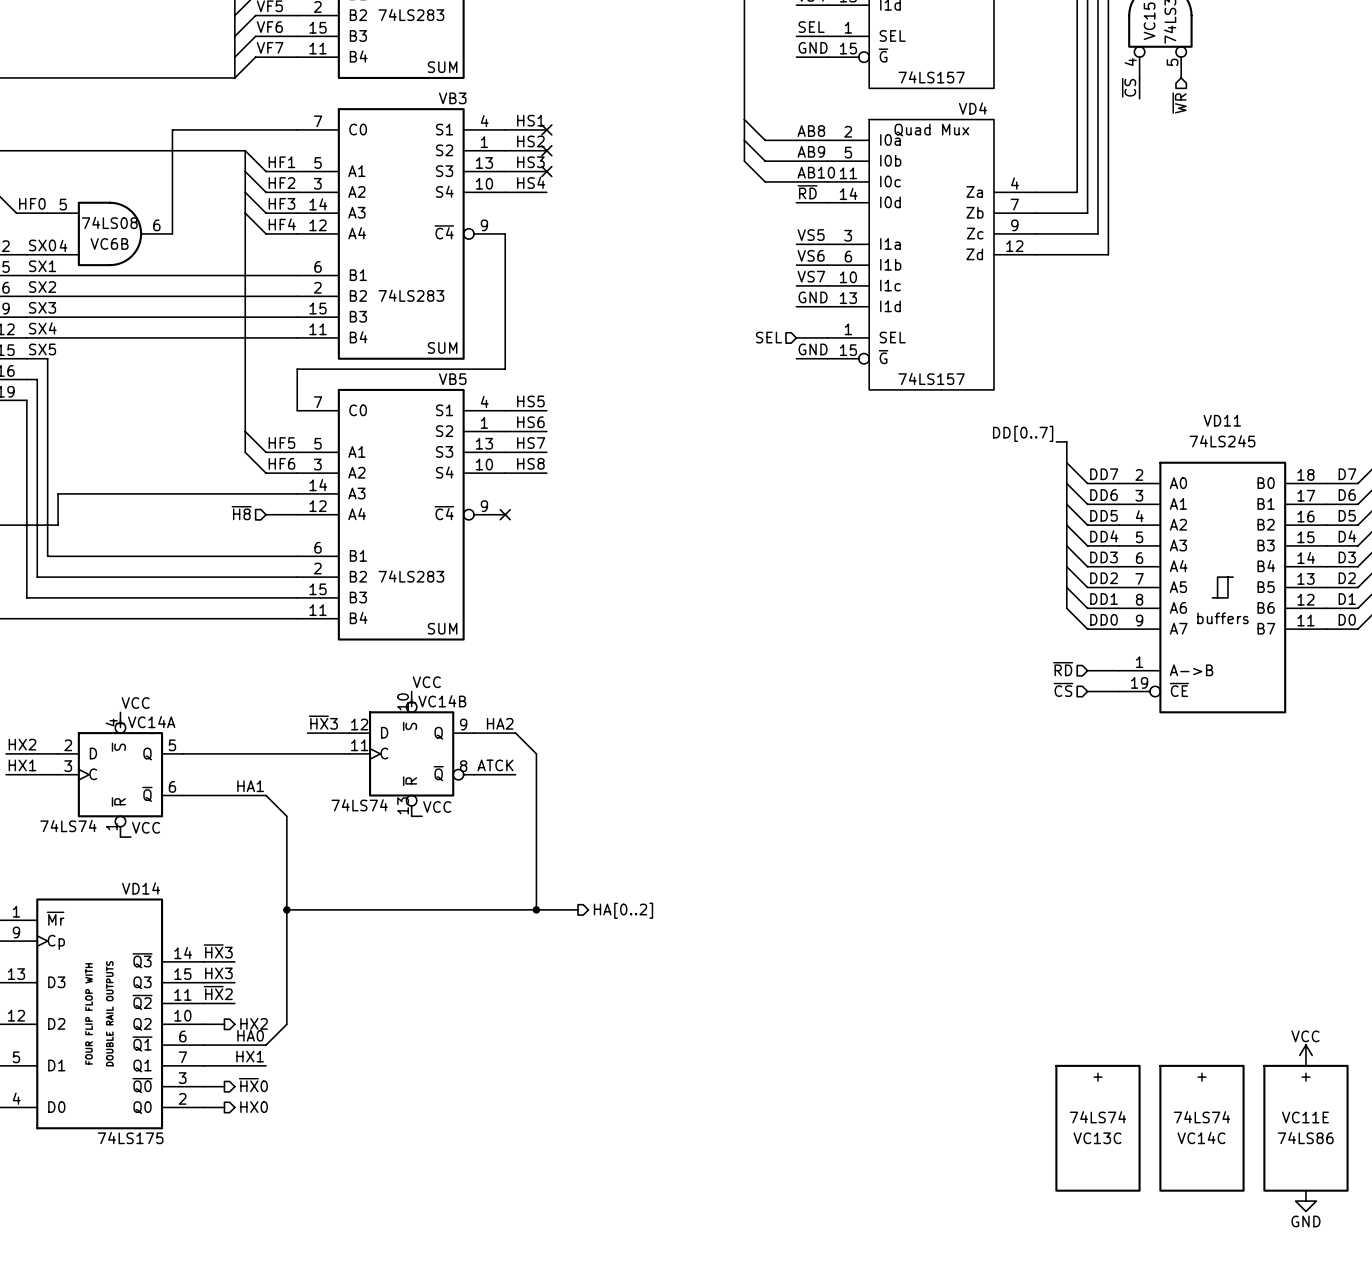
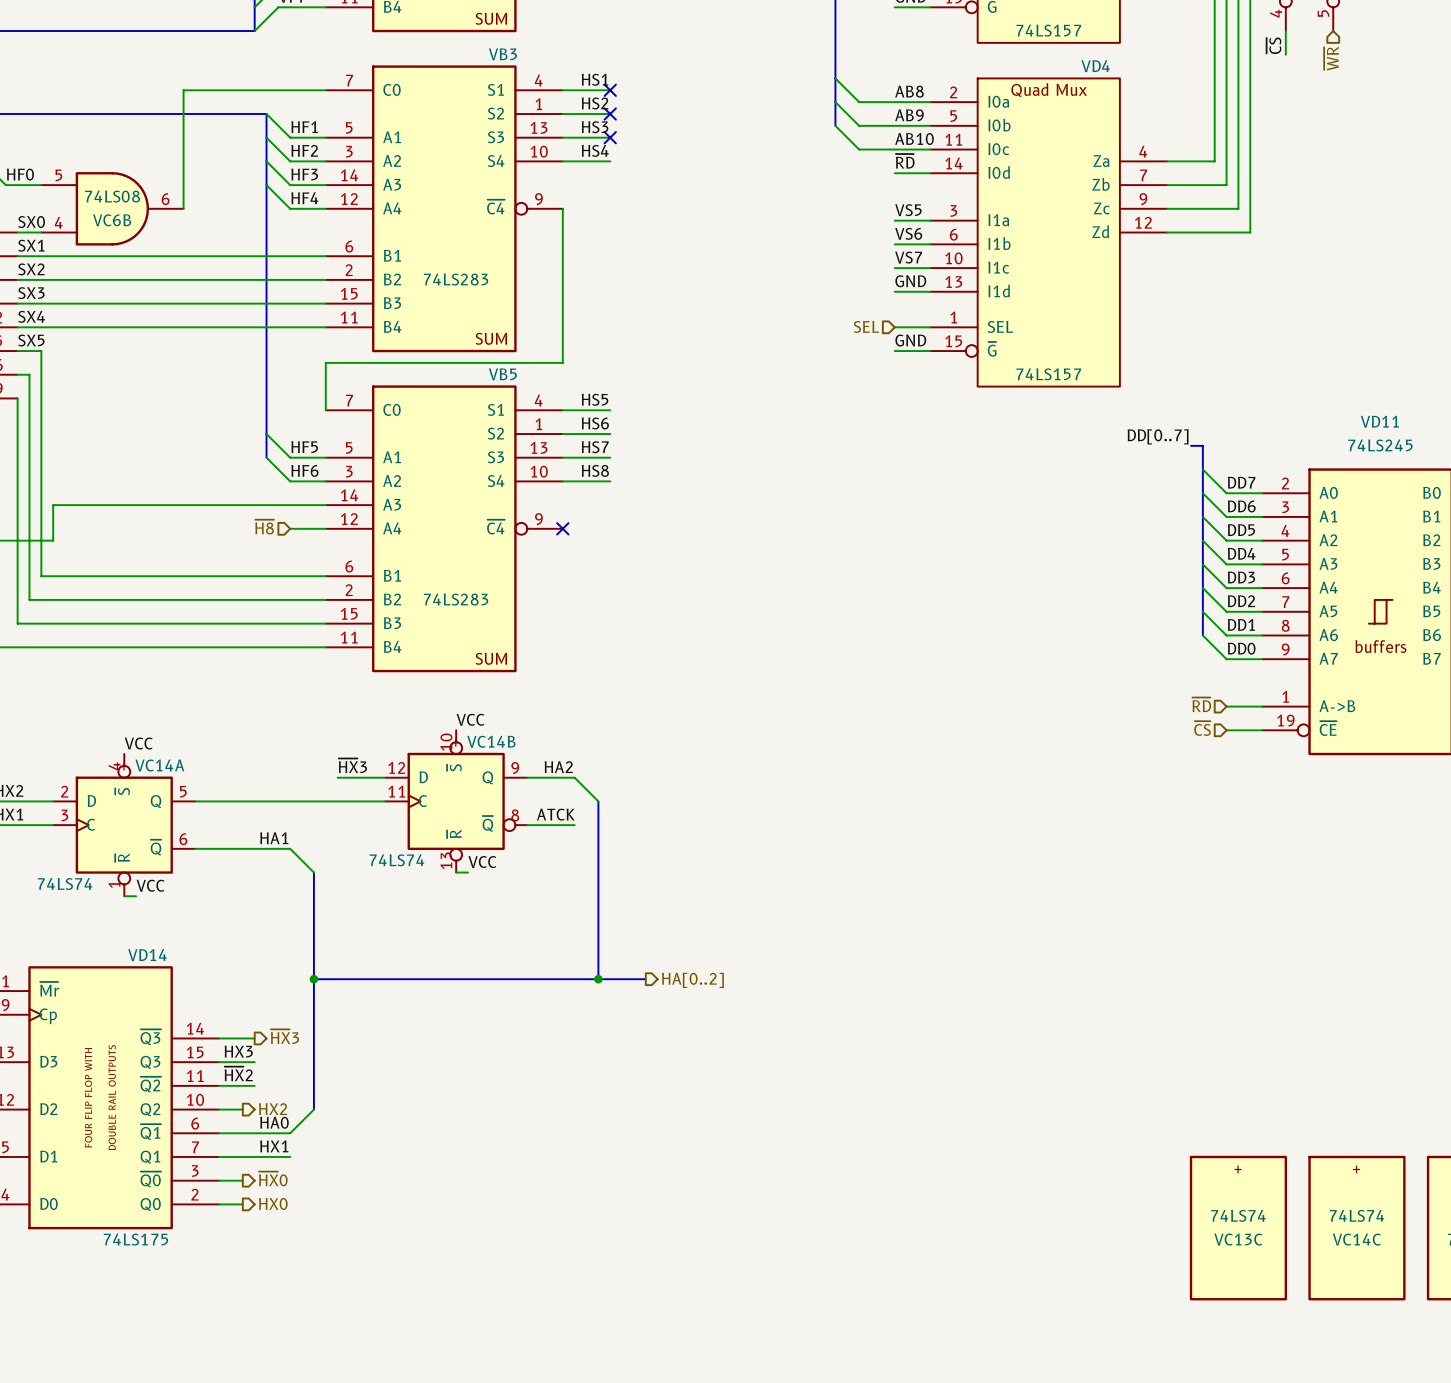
label: ~{HX}3 (218, 951) -> none
hierarchical label: none -> ~{HX}3 (284, 1036)

